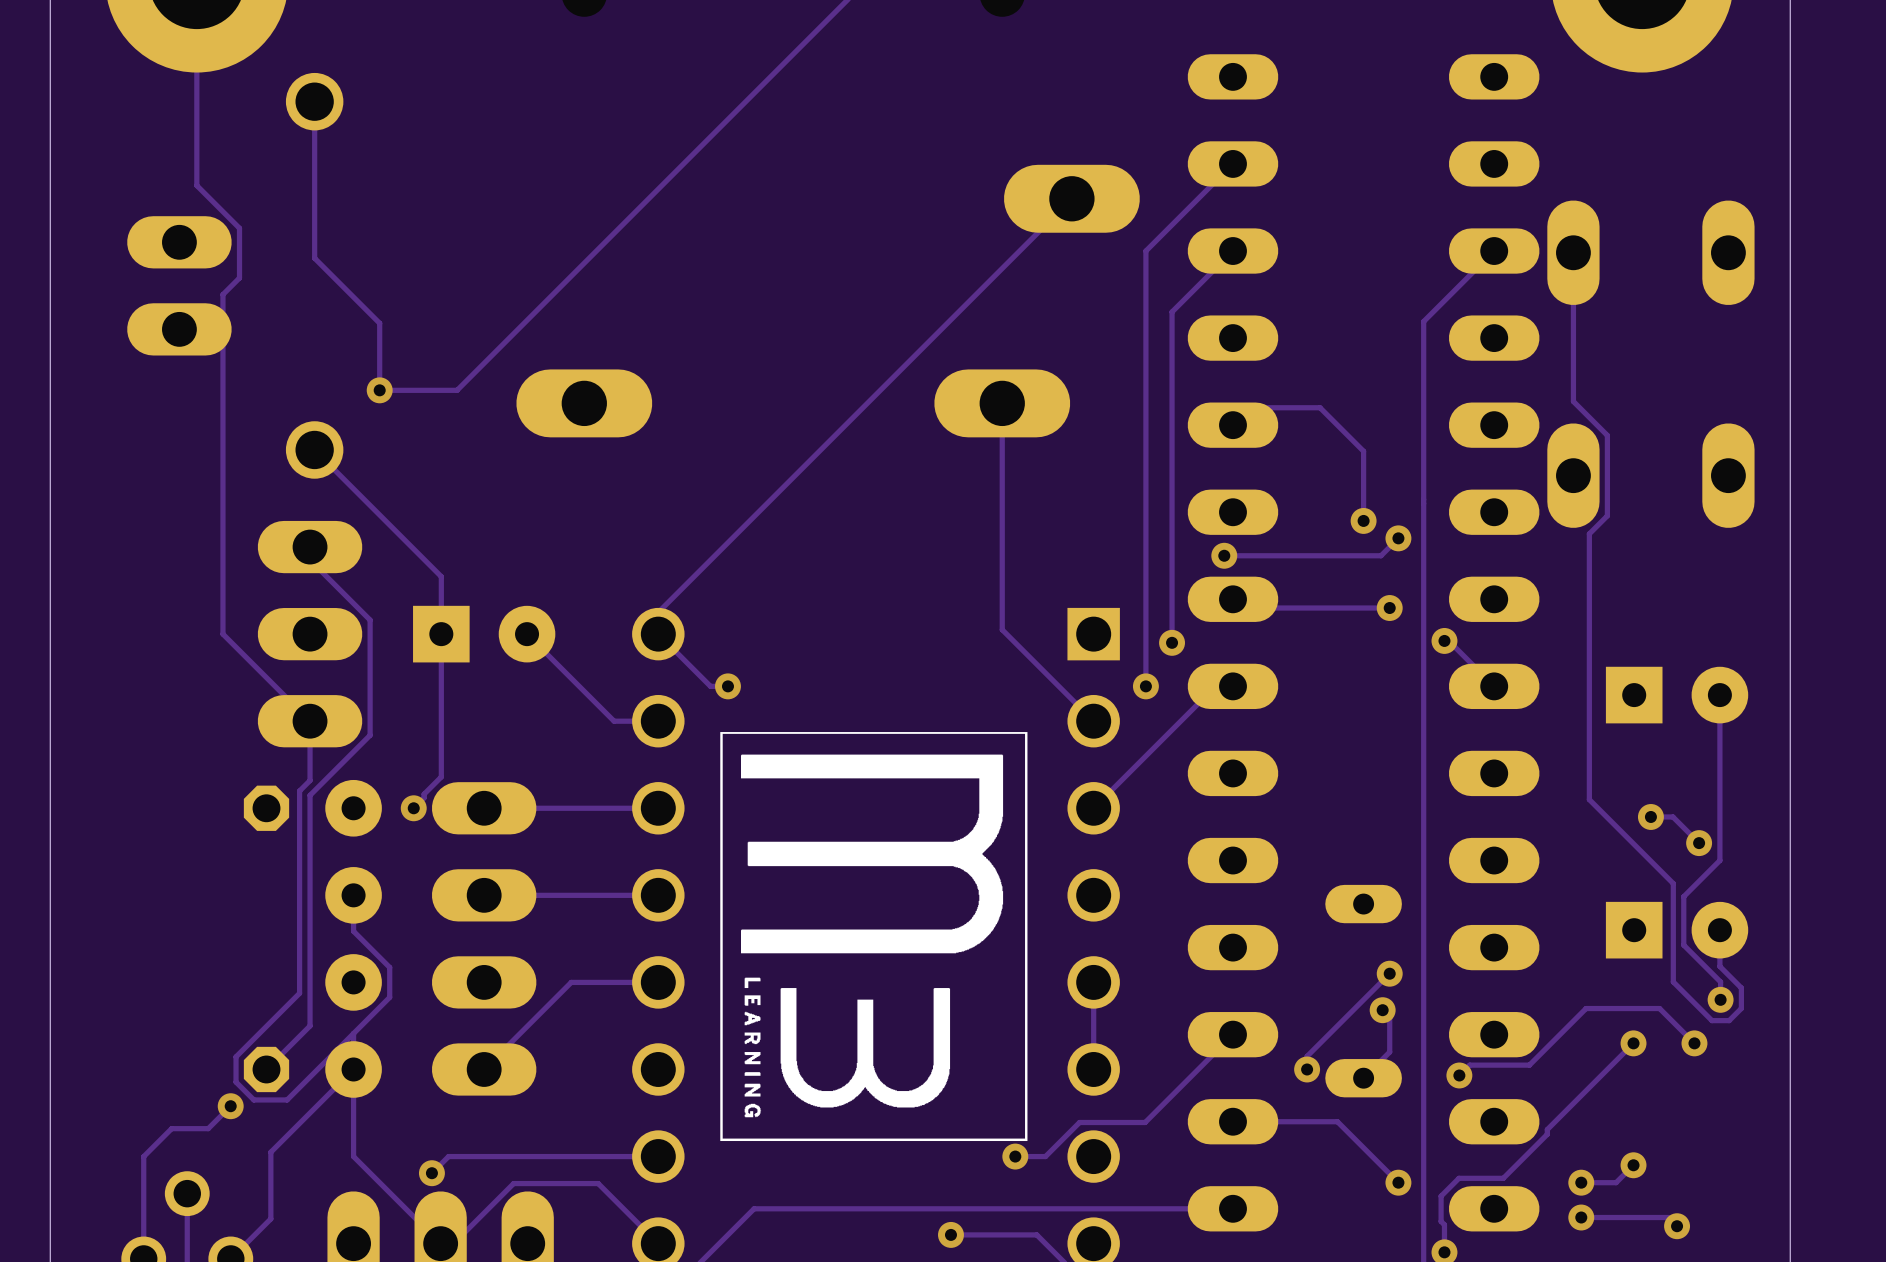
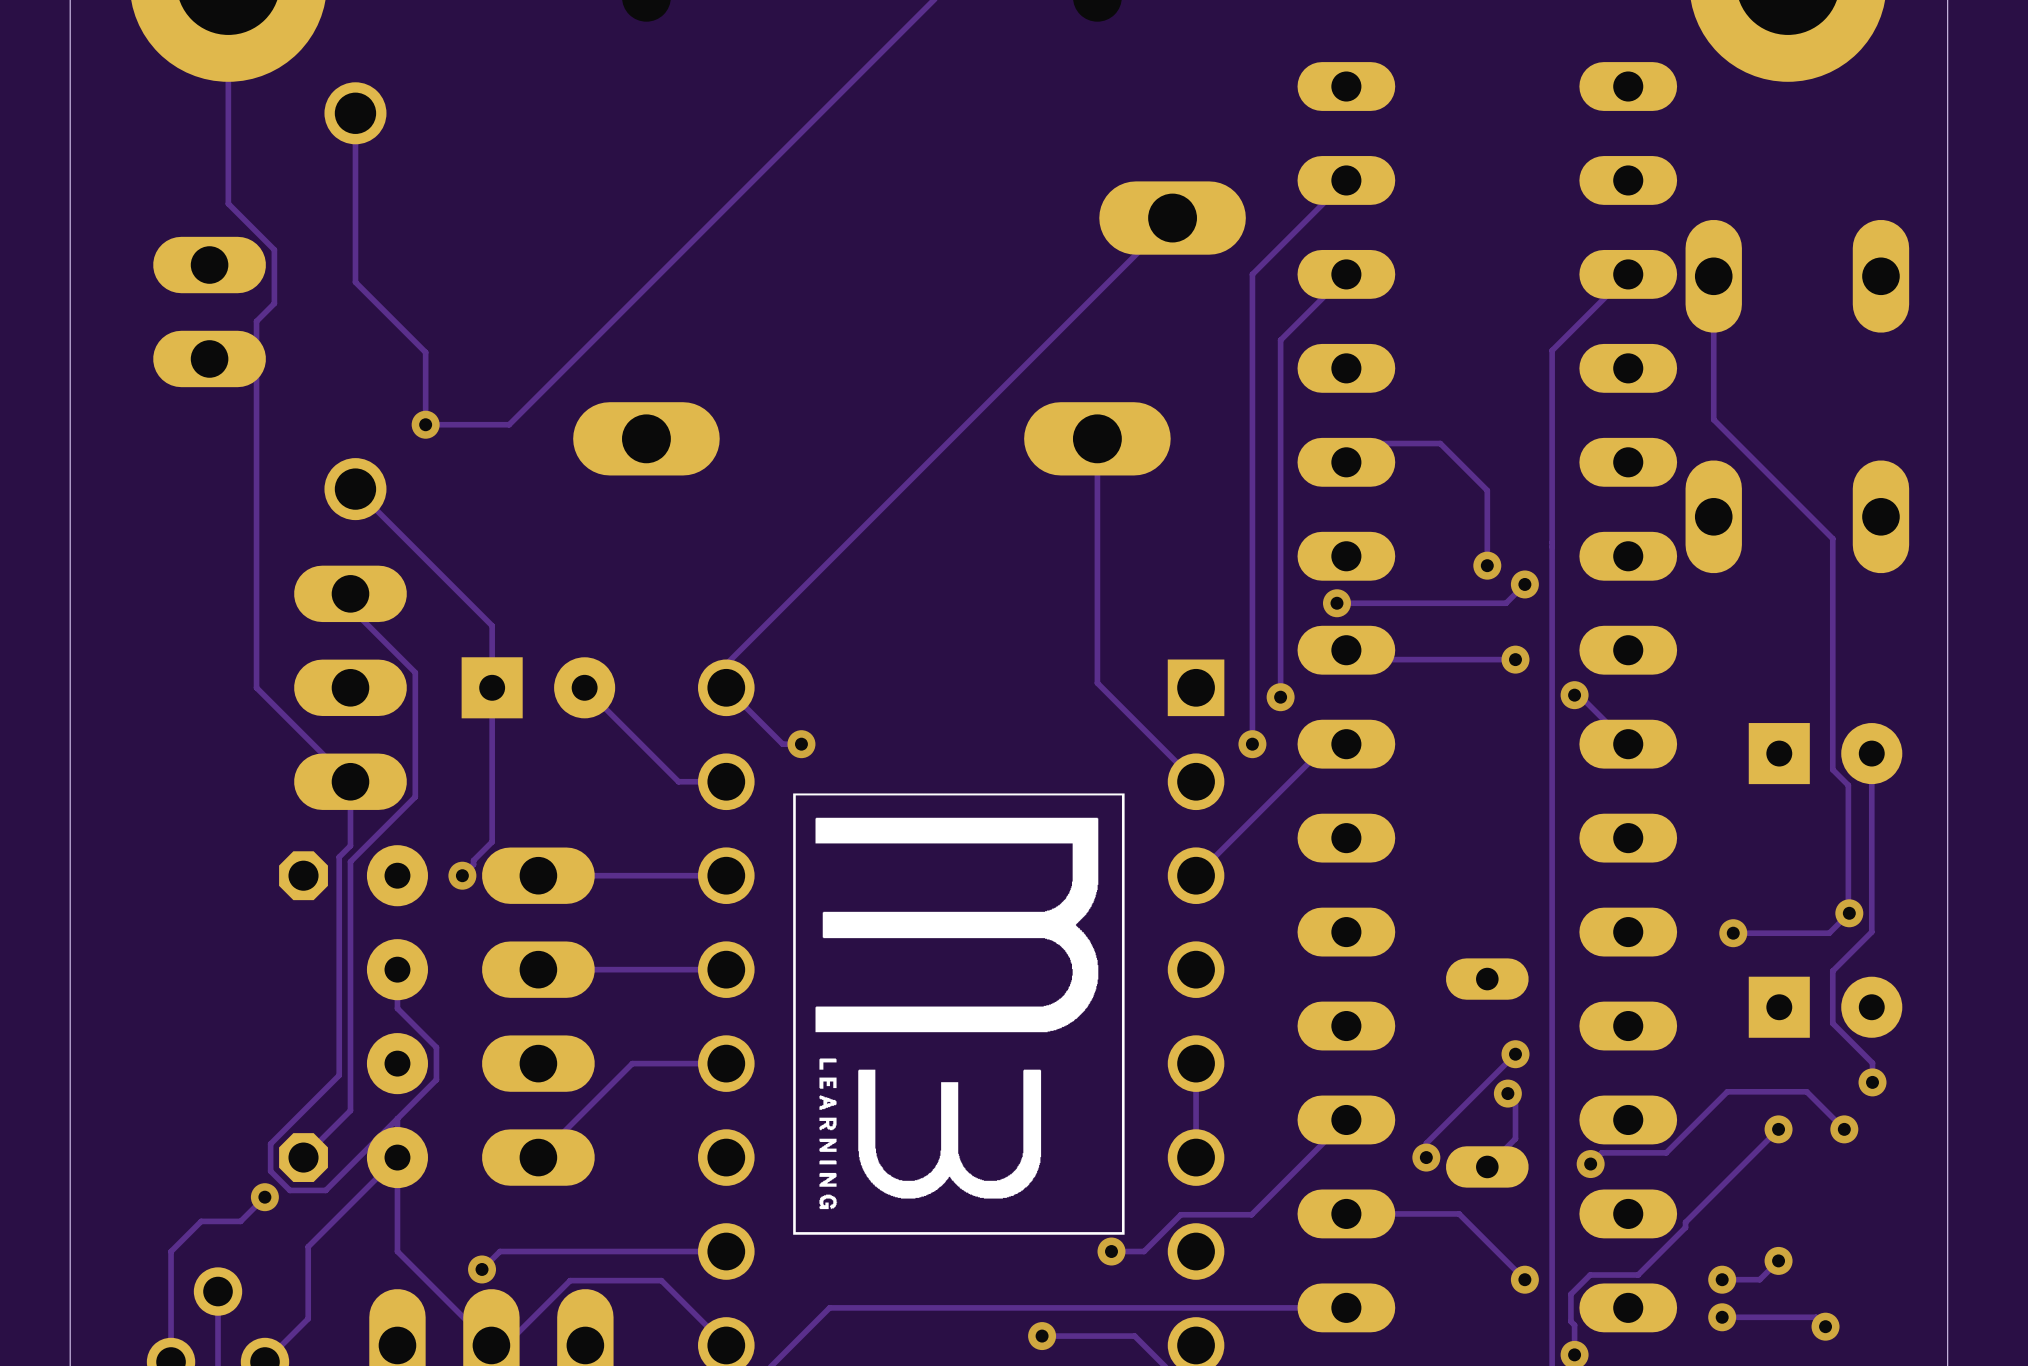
track: (1573, 385) (1573, 401) (1607, 435) (1607, 515) (1589, 533) (1589, 799) (1673, 883) (1673, 981) (1711, 1020) (1729, 1020) (1741, 1008) (1741, 987) (1719, 966) (1719, 930) -> (1713, 419) (1832, 538) (1832, 769) (1848, 785) (1848, 914) (1829, 933) (1733, 933)
track: (1650, 816) (1672, 816) (1699, 843) -> none
via position: (1650, 816) -> (1733, 933)

